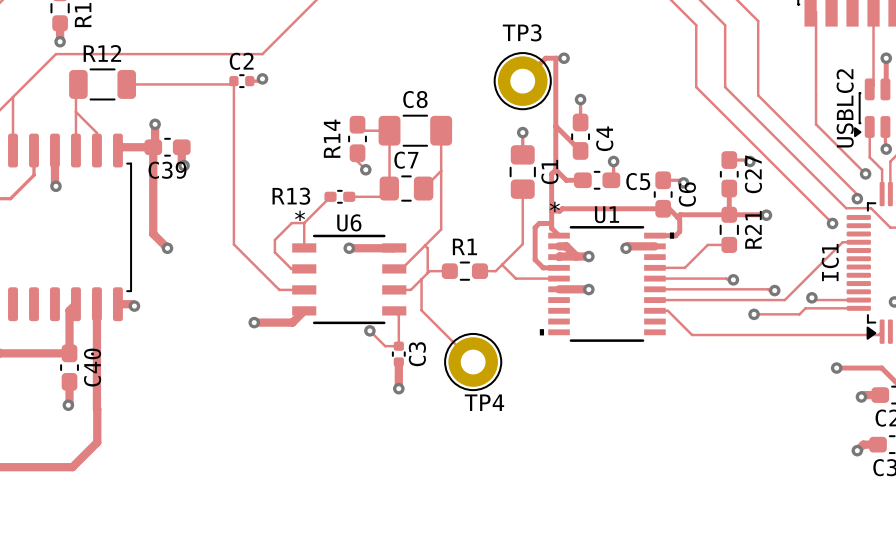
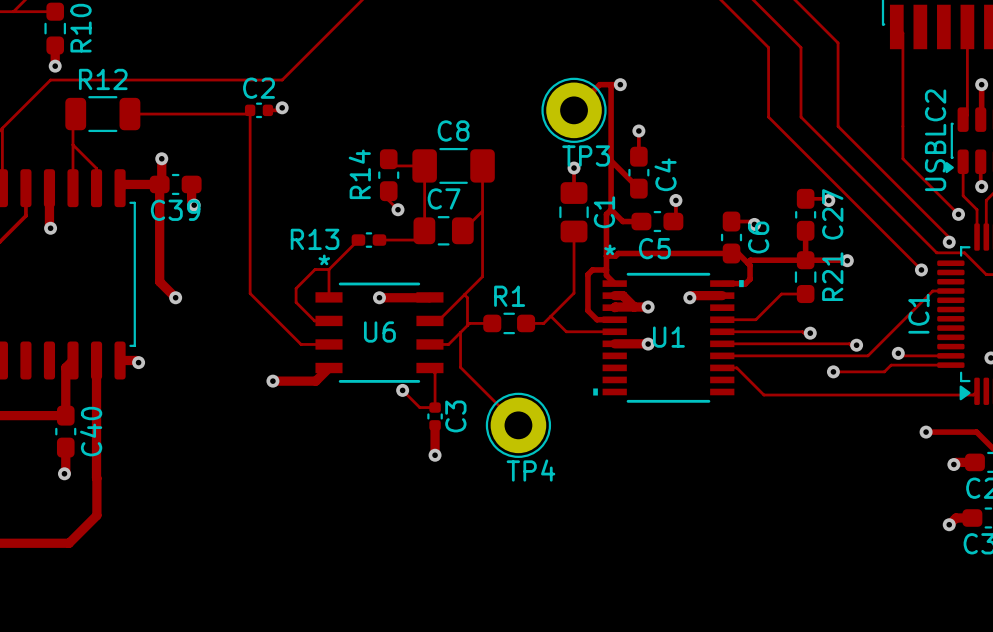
TP3 name position: TP3 (522, 32) -> TP3 (586, 155)
C5 name position: C5 (638, 181) -> C5 (654, 248)
U1 name position: U1 (607, 214) -> U1 (668, 337)
U6 name position: U6 (349, 222) -> U6 (379, 332)

